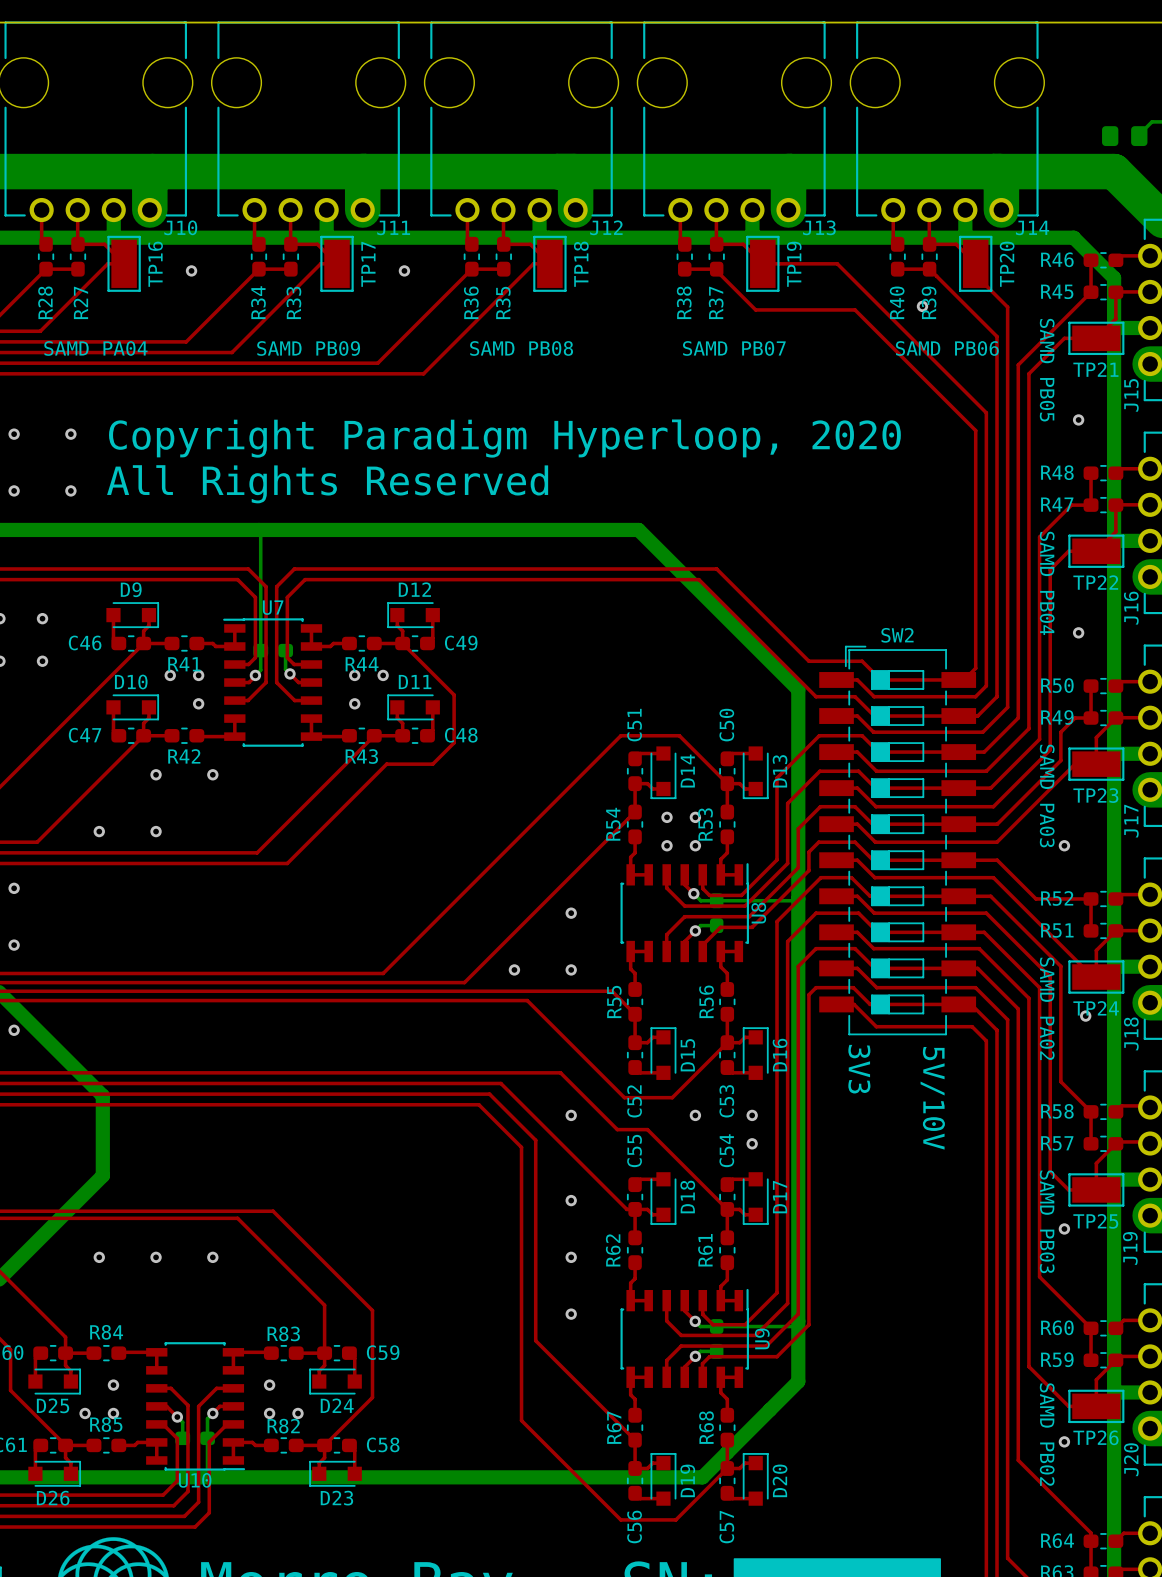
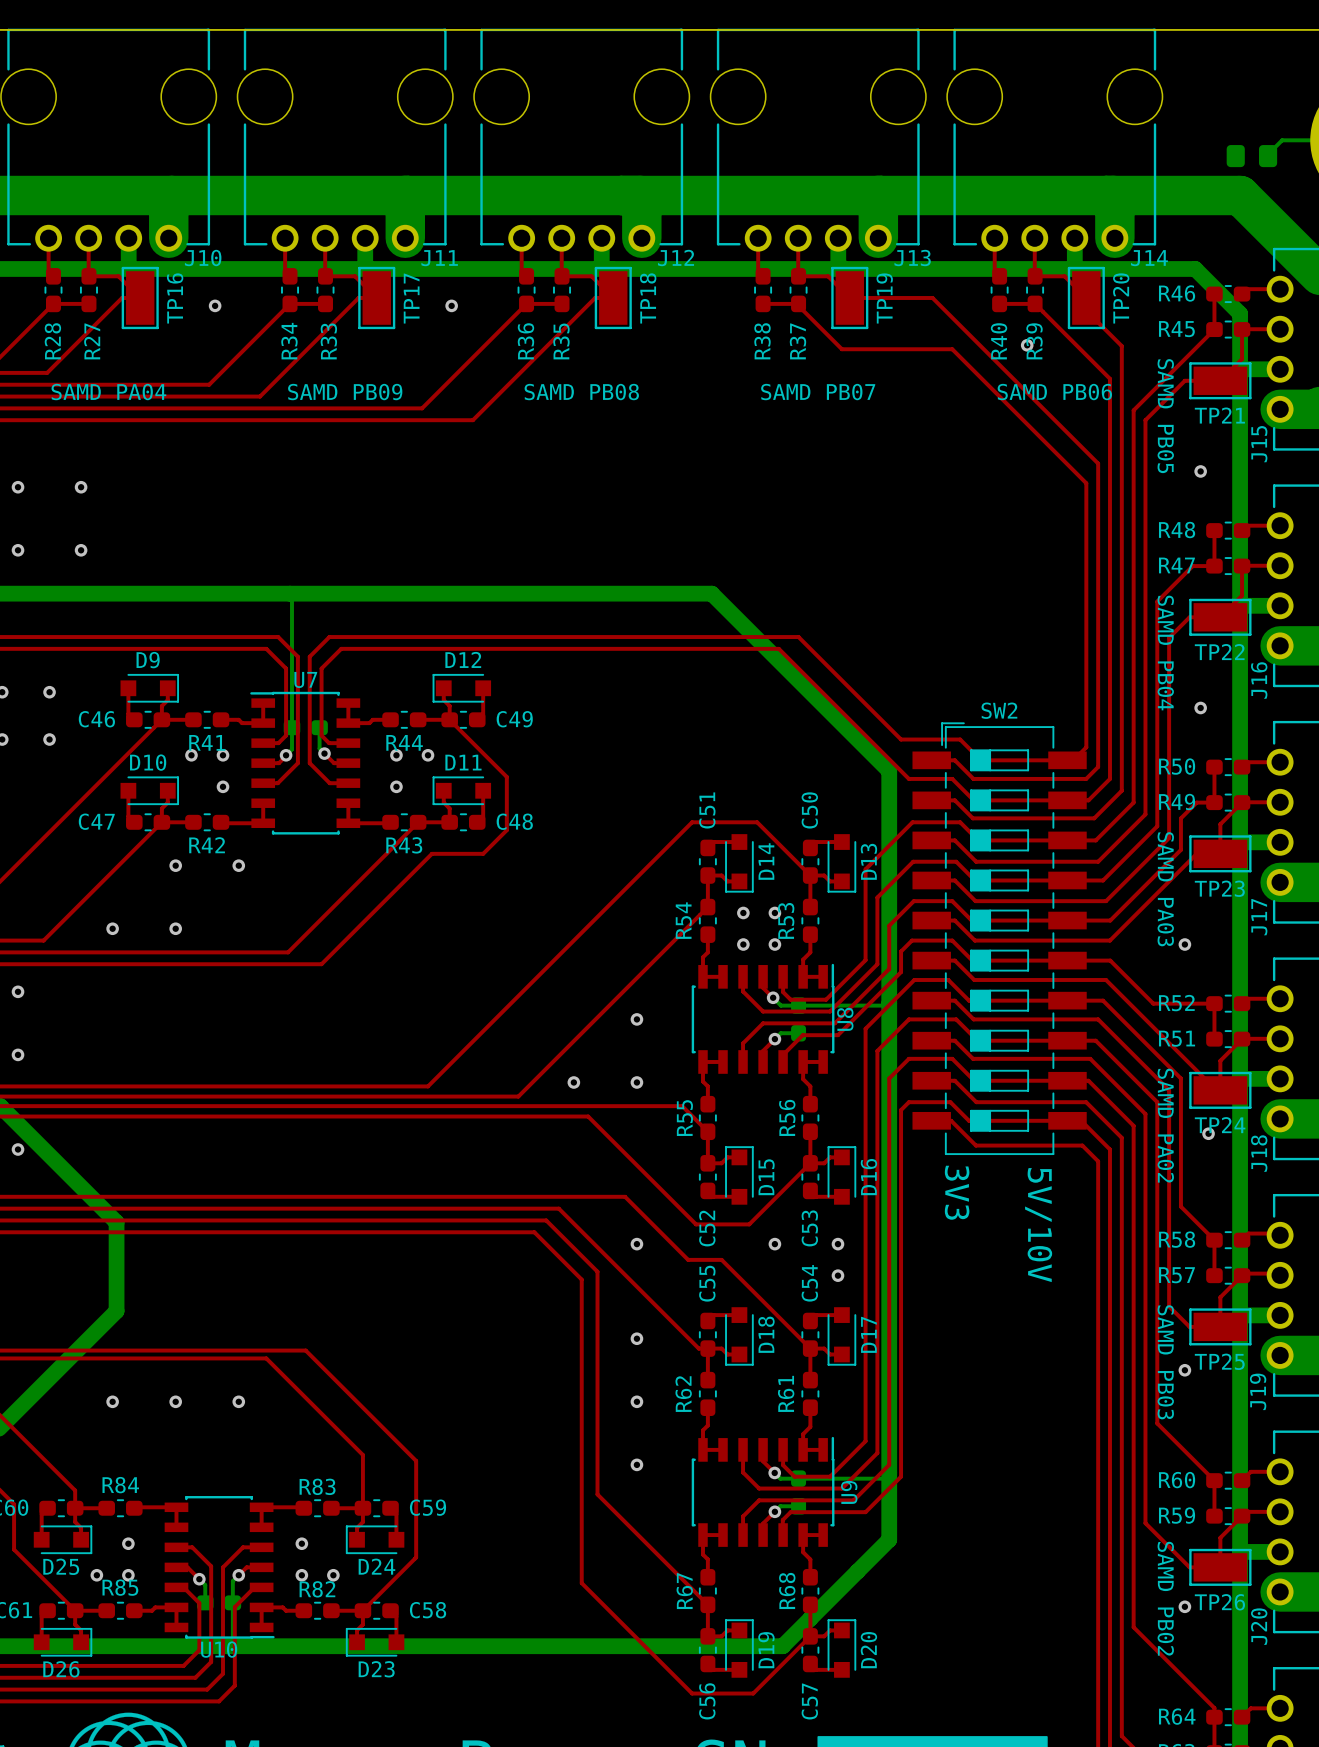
text: Copyright Paradigm Hyperloop, 2020 (504, 438) -> none
text: All Rights Reserved (327, 484) -> none

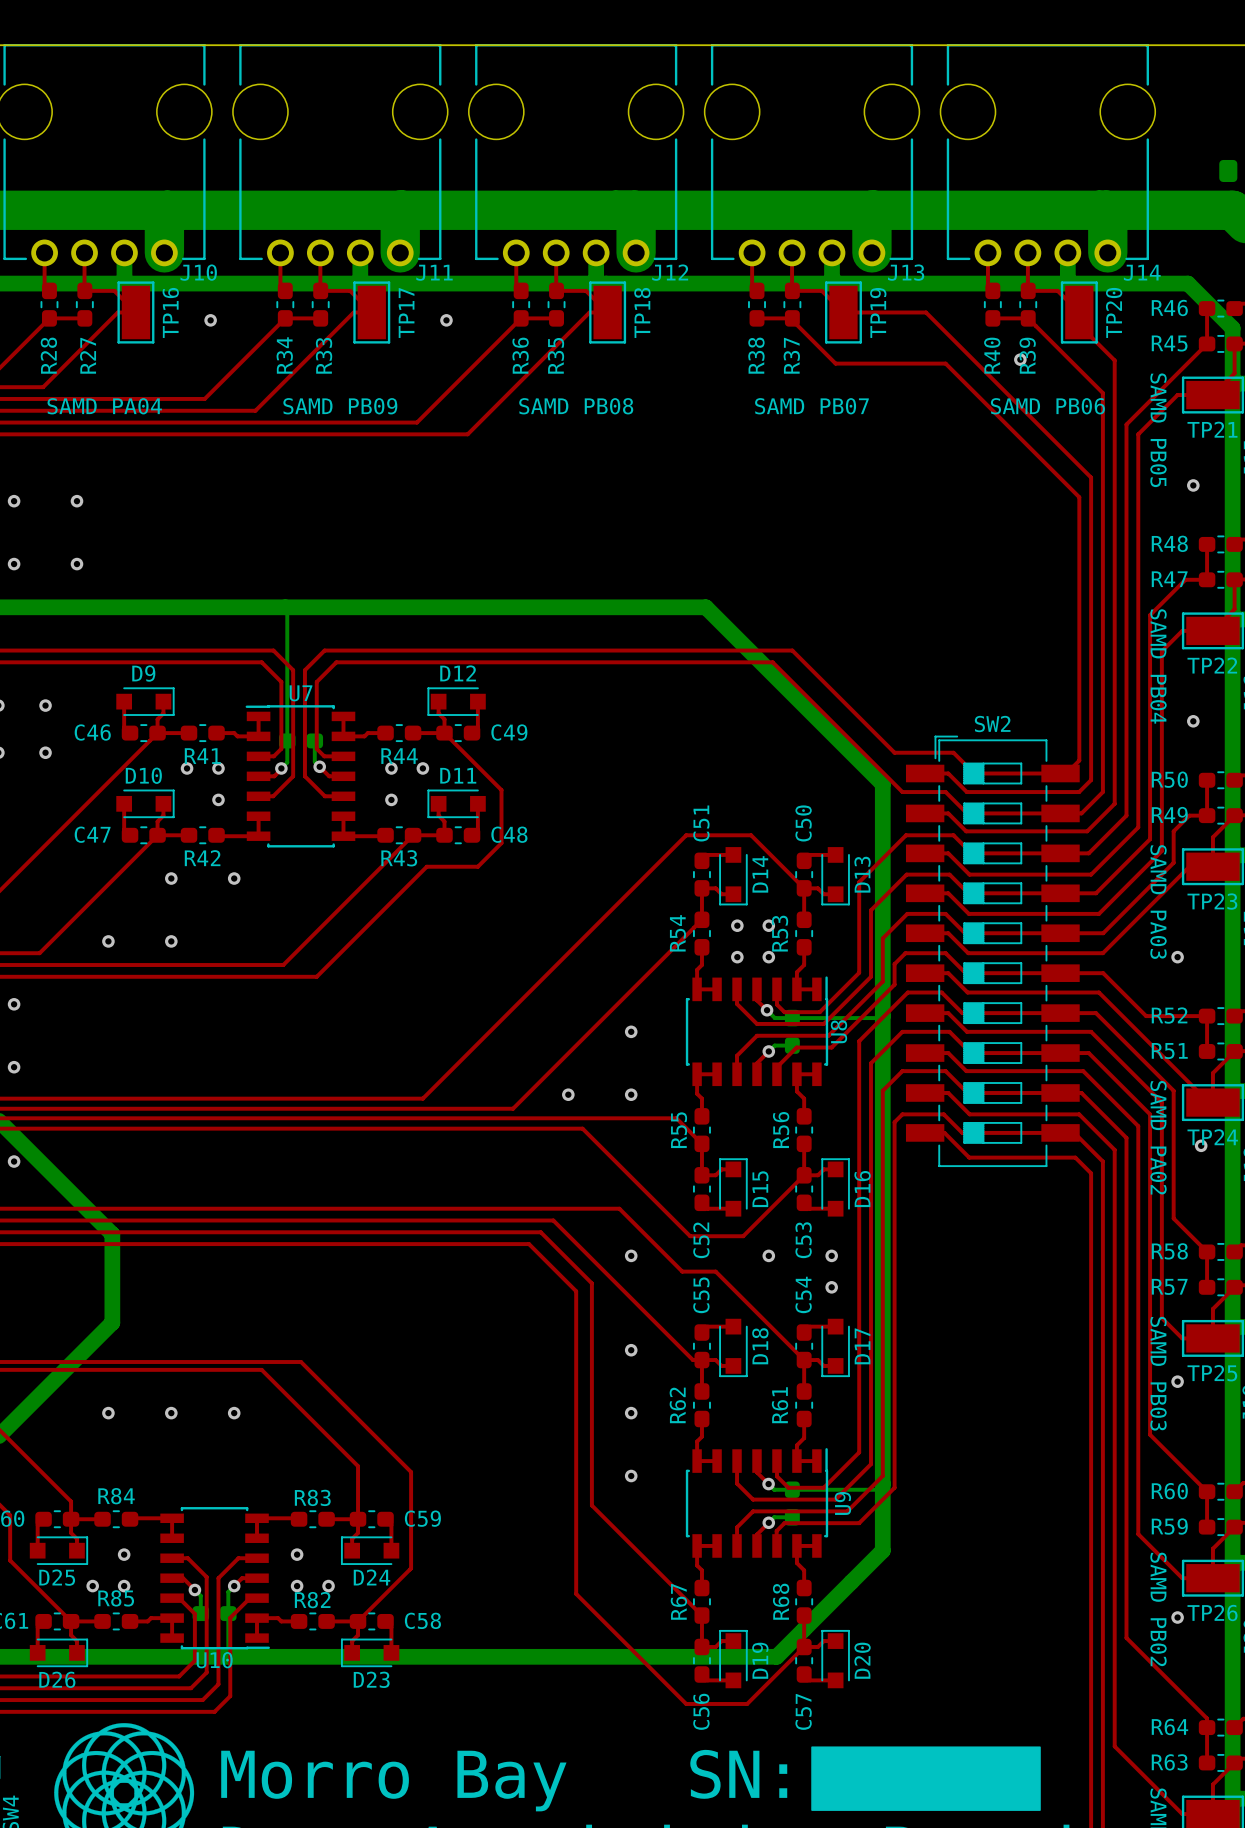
text: 3V3 (957, 1192) -> none
text: 5V/10V (1038, 1225) -> none

